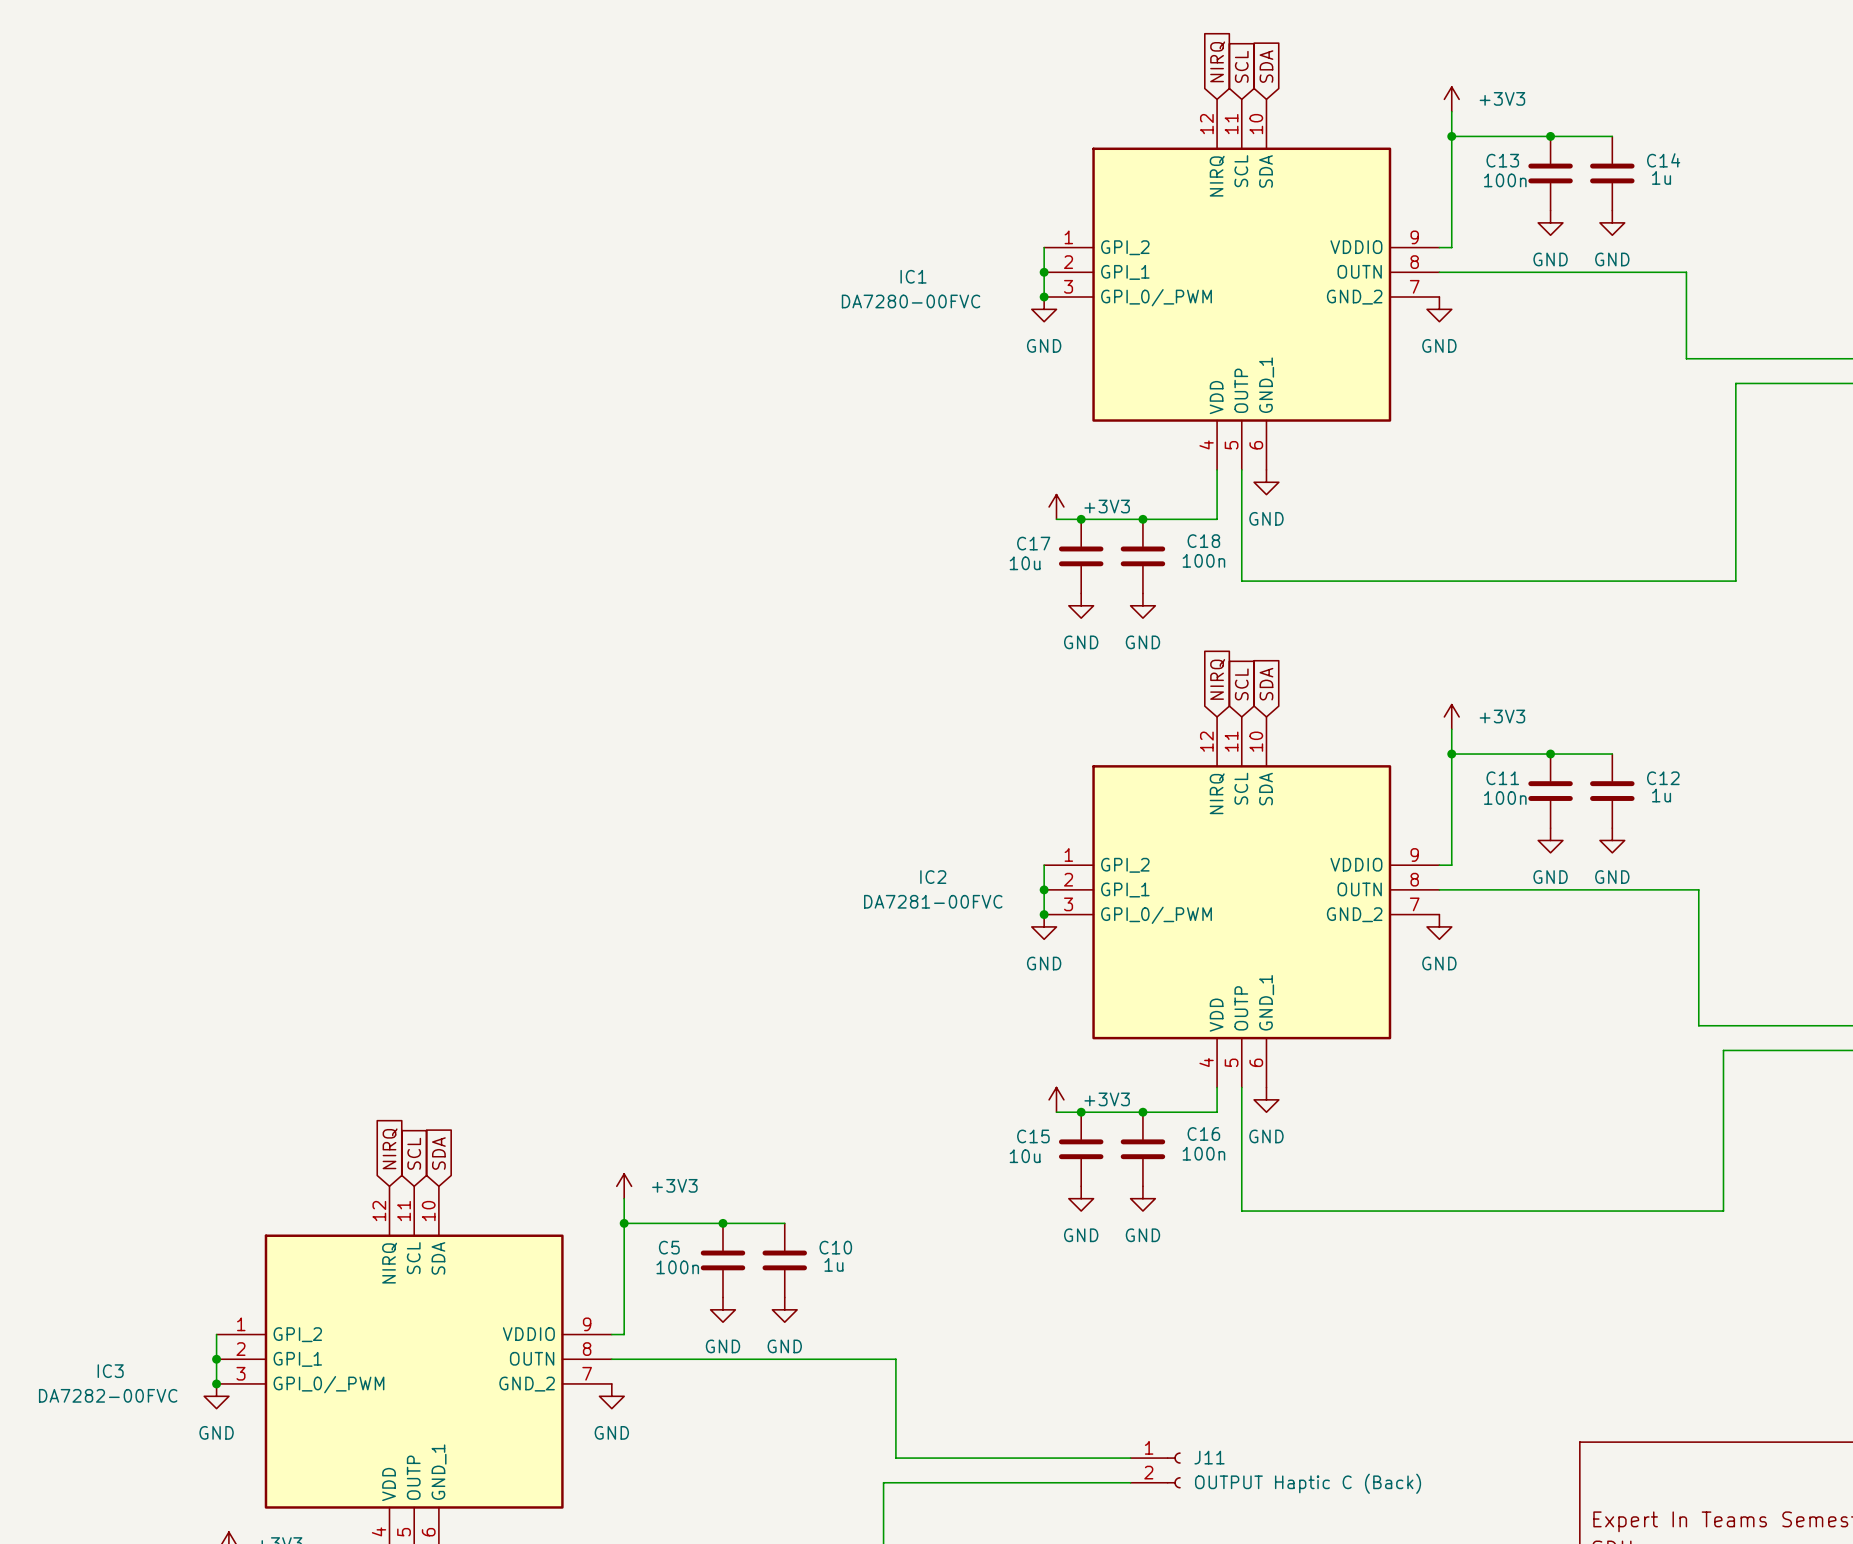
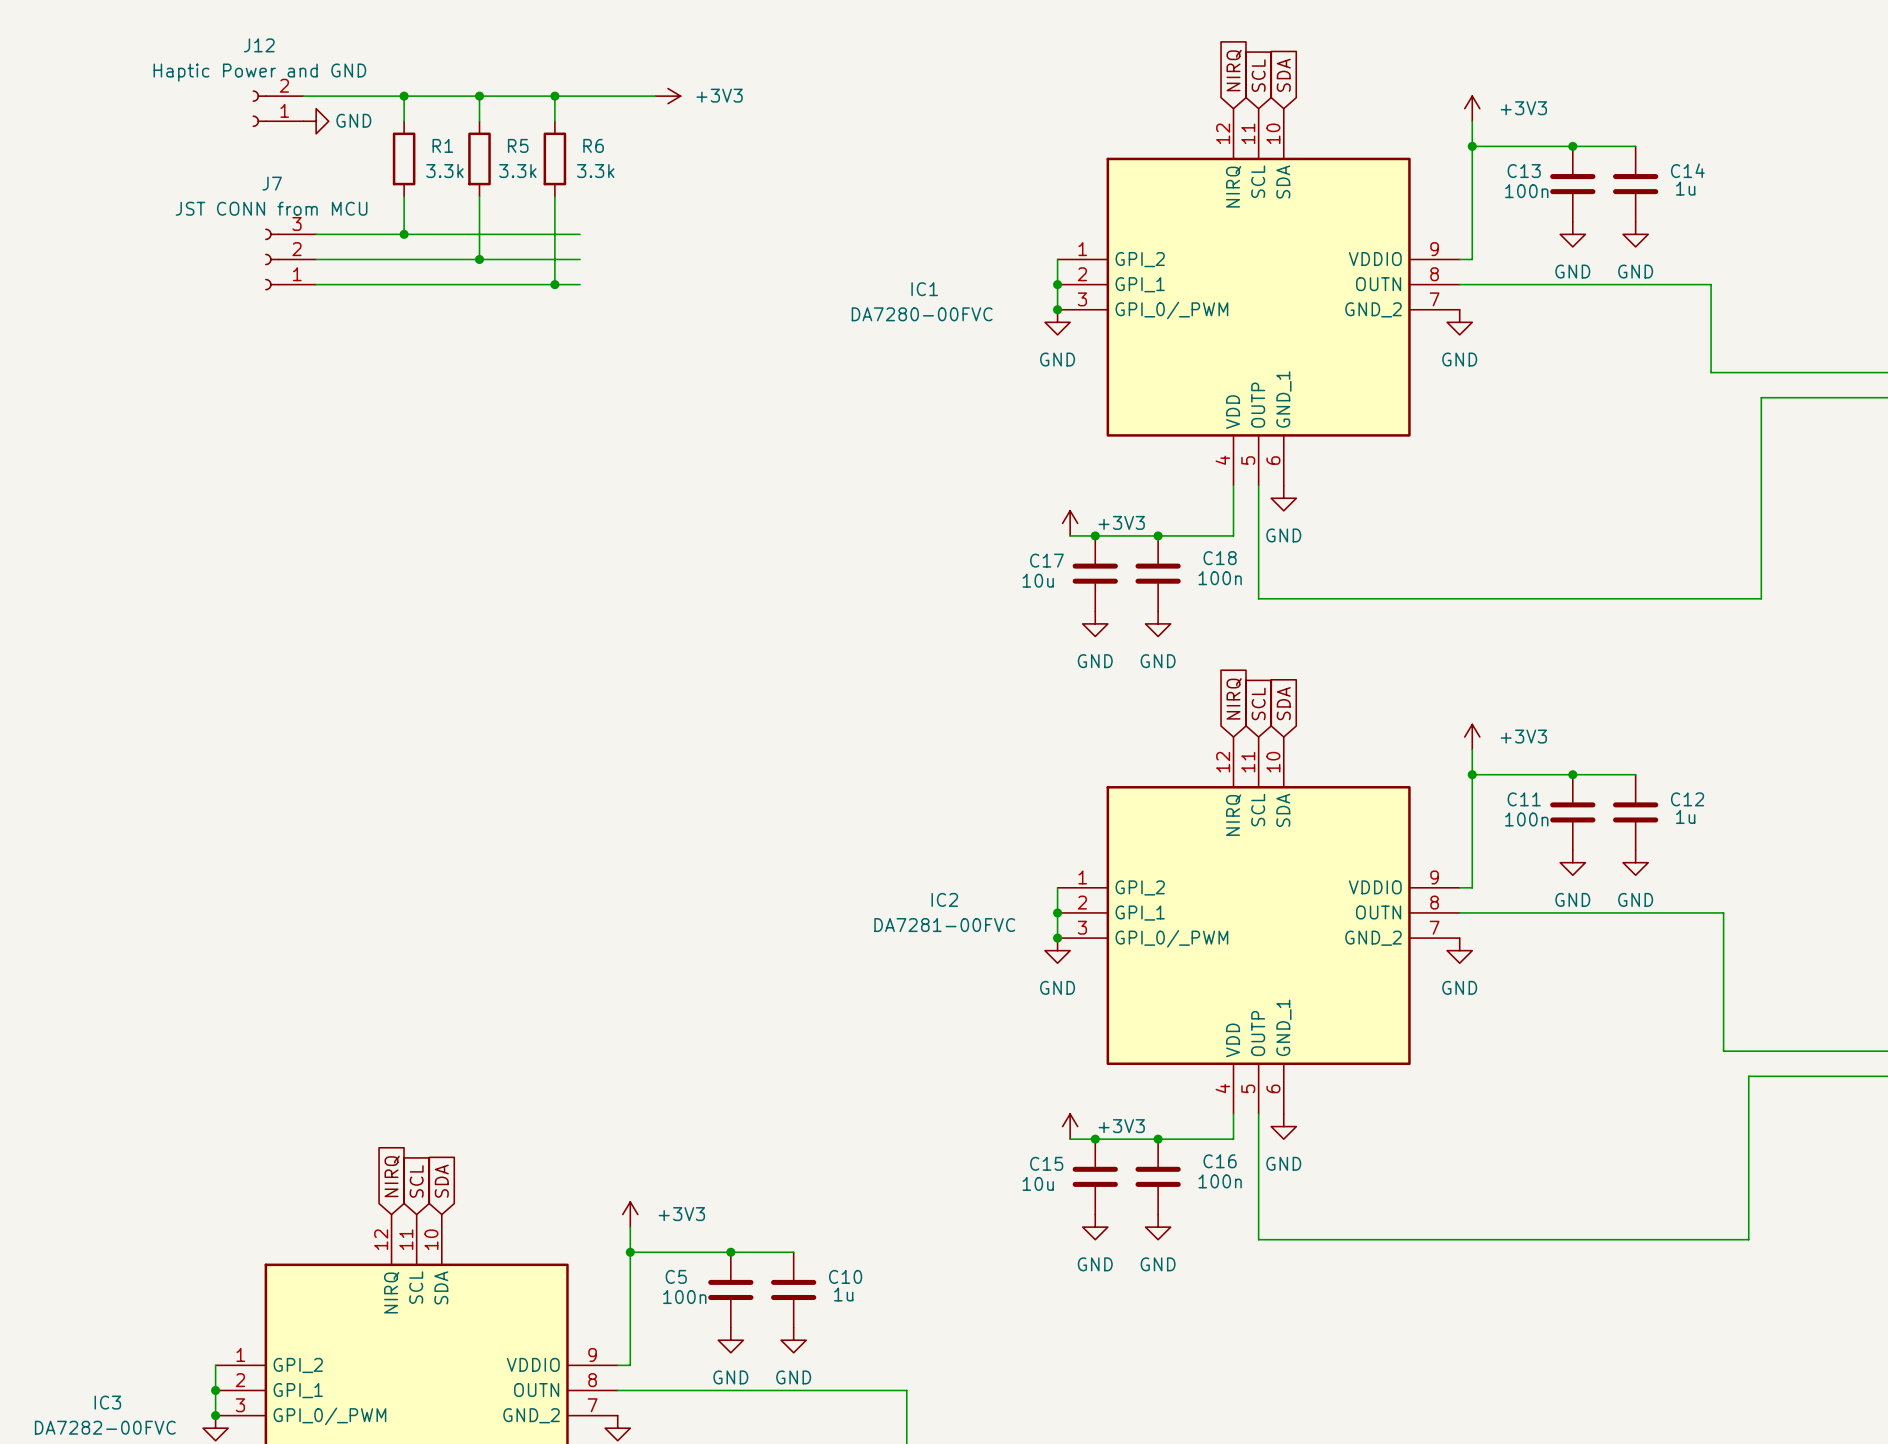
wire: none -> (303, 96) (655, 96)
wire: none -> (404, 96) (404, 121)
junction: none -> (404, 96)
wire: none -> (479, 96) (479, 121)
junction: none -> (479, 96)
wire: none -> (554, 96) (554, 121)
junction: none -> (554, 96)
power symbol: none -> +3V3 (668, 96)
J12: none -> Haptic Power and GND (278, 108)
power symbol: none -> GND (316, 121)
R1: none -> 3.3k (404, 158)
R5: none -> 3.3k (479, 158)
R6: none -> 3.3k (554, 158)
wire: none -> (404, 196) (404, 234)
wire: none -> (479, 196) (479, 259)
wire: none -> (554, 196) (554, 284)
wire: none -> (316, 234) (580, 234)
junction: none -> (404, 234)
J7: none -> JST CONN from MCU (290, 259)
wire: none -> (316, 259) (580, 259)
junction: none -> (479, 259)
wire: none -> (316, 284) (580, 284)
junction: none -> (554, 284)

